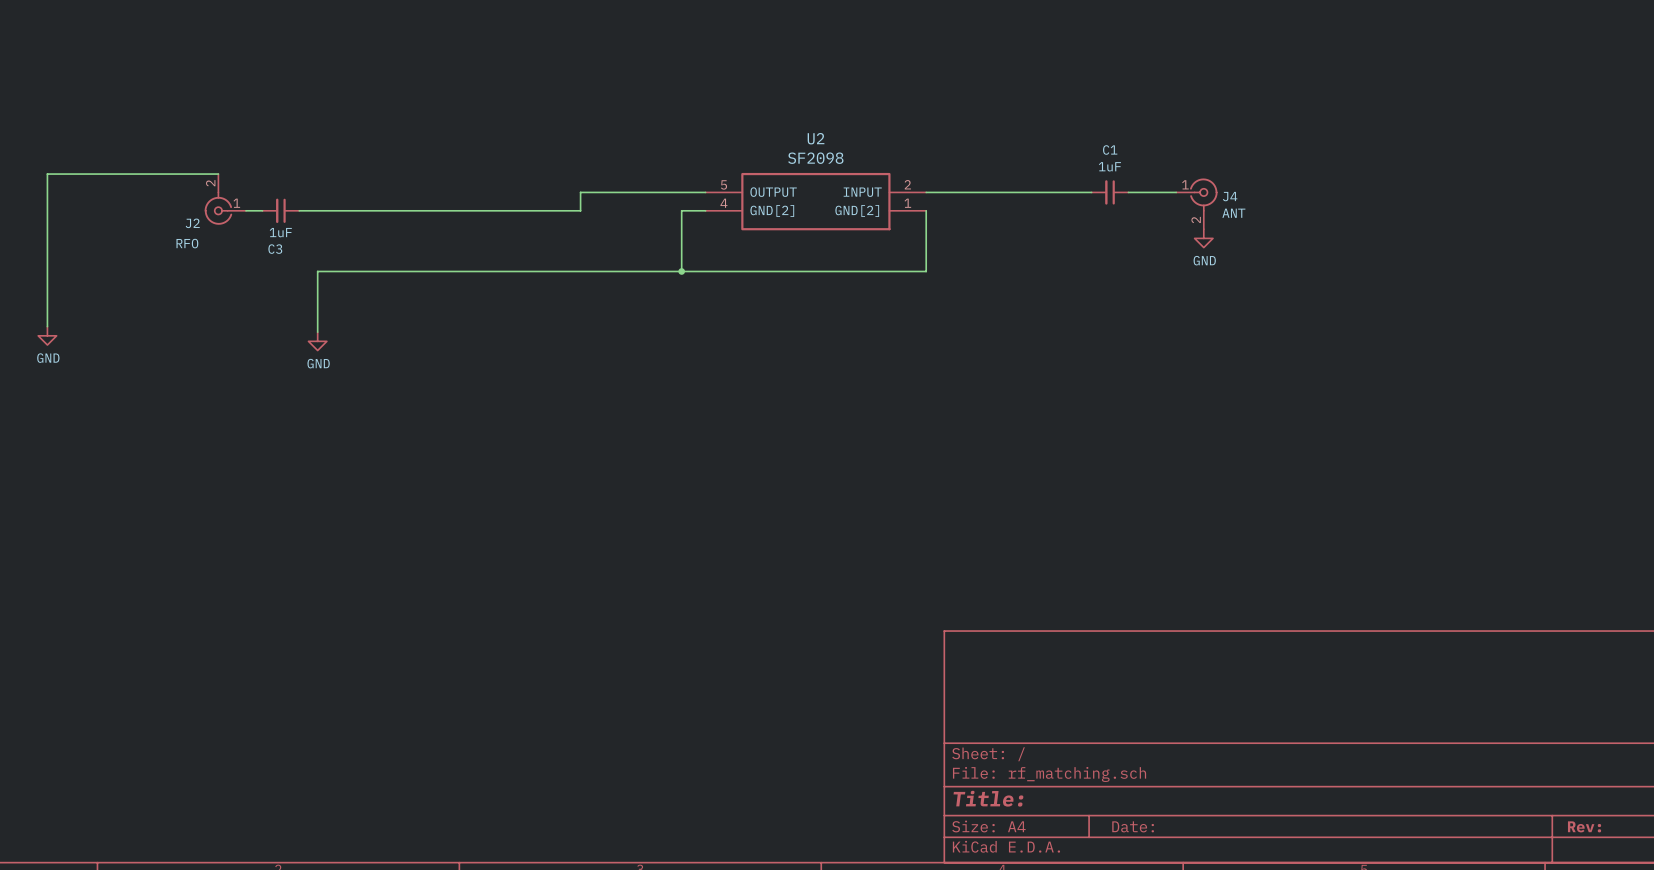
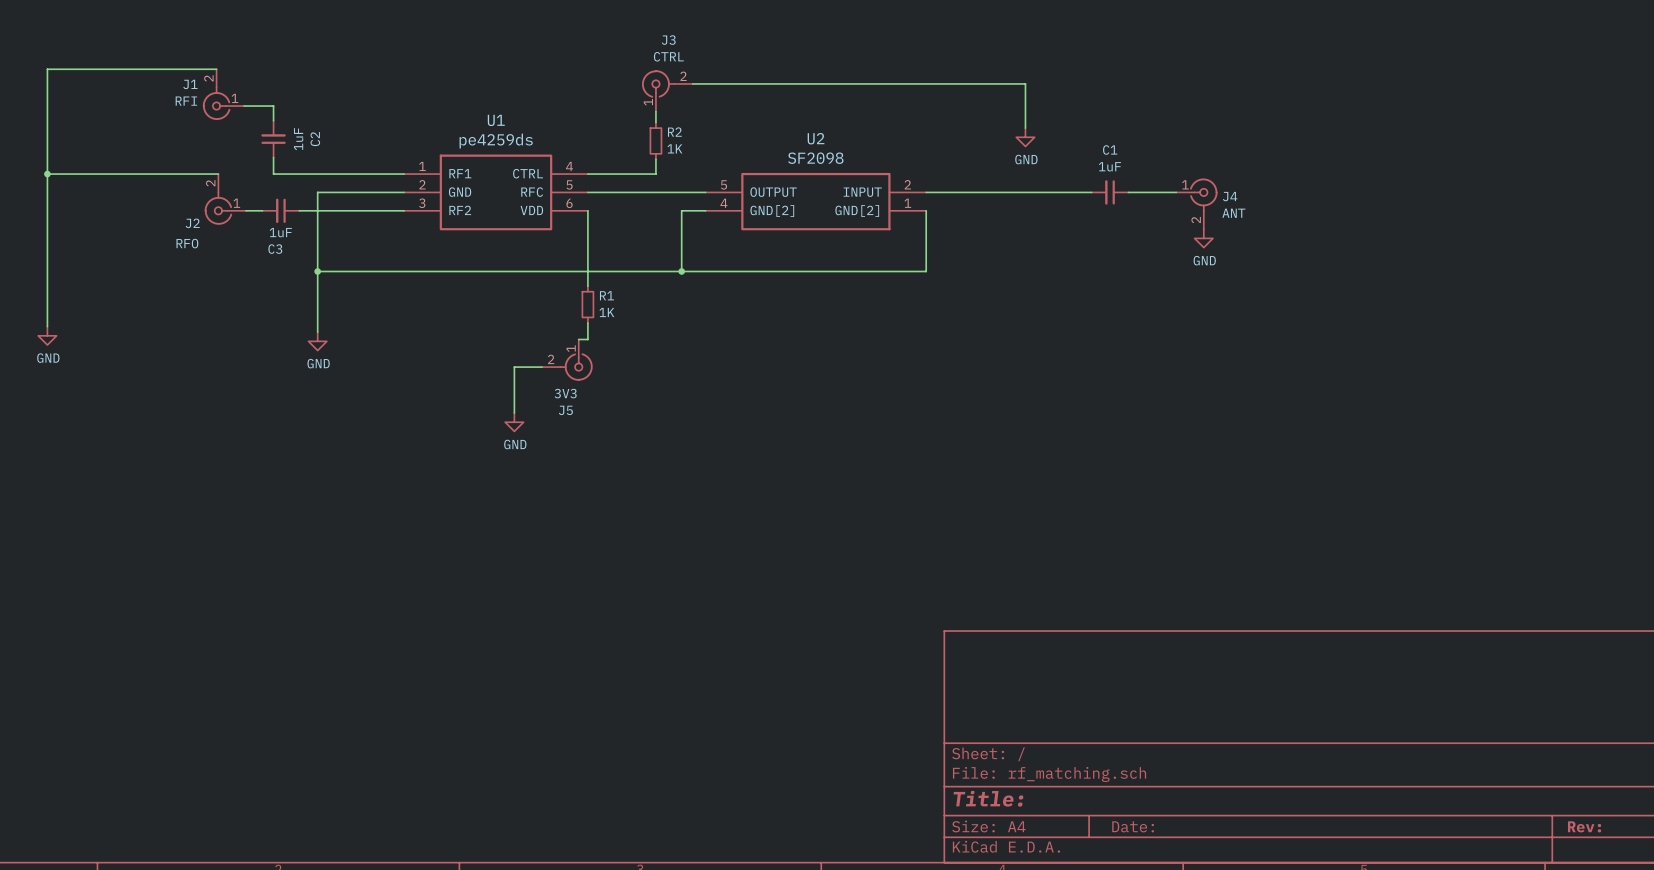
wire: none -> (216, 69) (47, 69) (47, 174)
wire: none -> (692, 83) (1025, 83) (1025, 128)
J3: none -> CTRL (667, 90)
J1: none -> RFI (223, 94)
wire: none -> (244, 106) (273, 106) (273, 120)
wire: none -> (655, 111) (655, 122)
power symbol: none -> GND (1025, 137)
C2: none -> 1uF (273, 139)
R2: none -> 1K (655, 140)
wire: none -> (273, 157) (273, 174) (404, 174)
wire: none -> (655, 159) (655, 174) (587, 174)
junction: none -> (47, 174)
wire: none -> (404, 192) (317, 192) (317, 271)
U1: none -> pe4259ds (496, 192)
wire: (587, 192) (580, 192) (580, 210) (404, 210) -> none
wire: none -> (587, 210) (587, 286)
junction: none -> (317, 271)
R1: none -> 1K (587, 304)
wire: none -> (587, 322) (587, 339) (578, 339)
J5: none -> 3V3 (567, 360)
wire: none -> (541, 367) (514, 367) (514, 413)
power symbol: none -> GND (514, 422)

